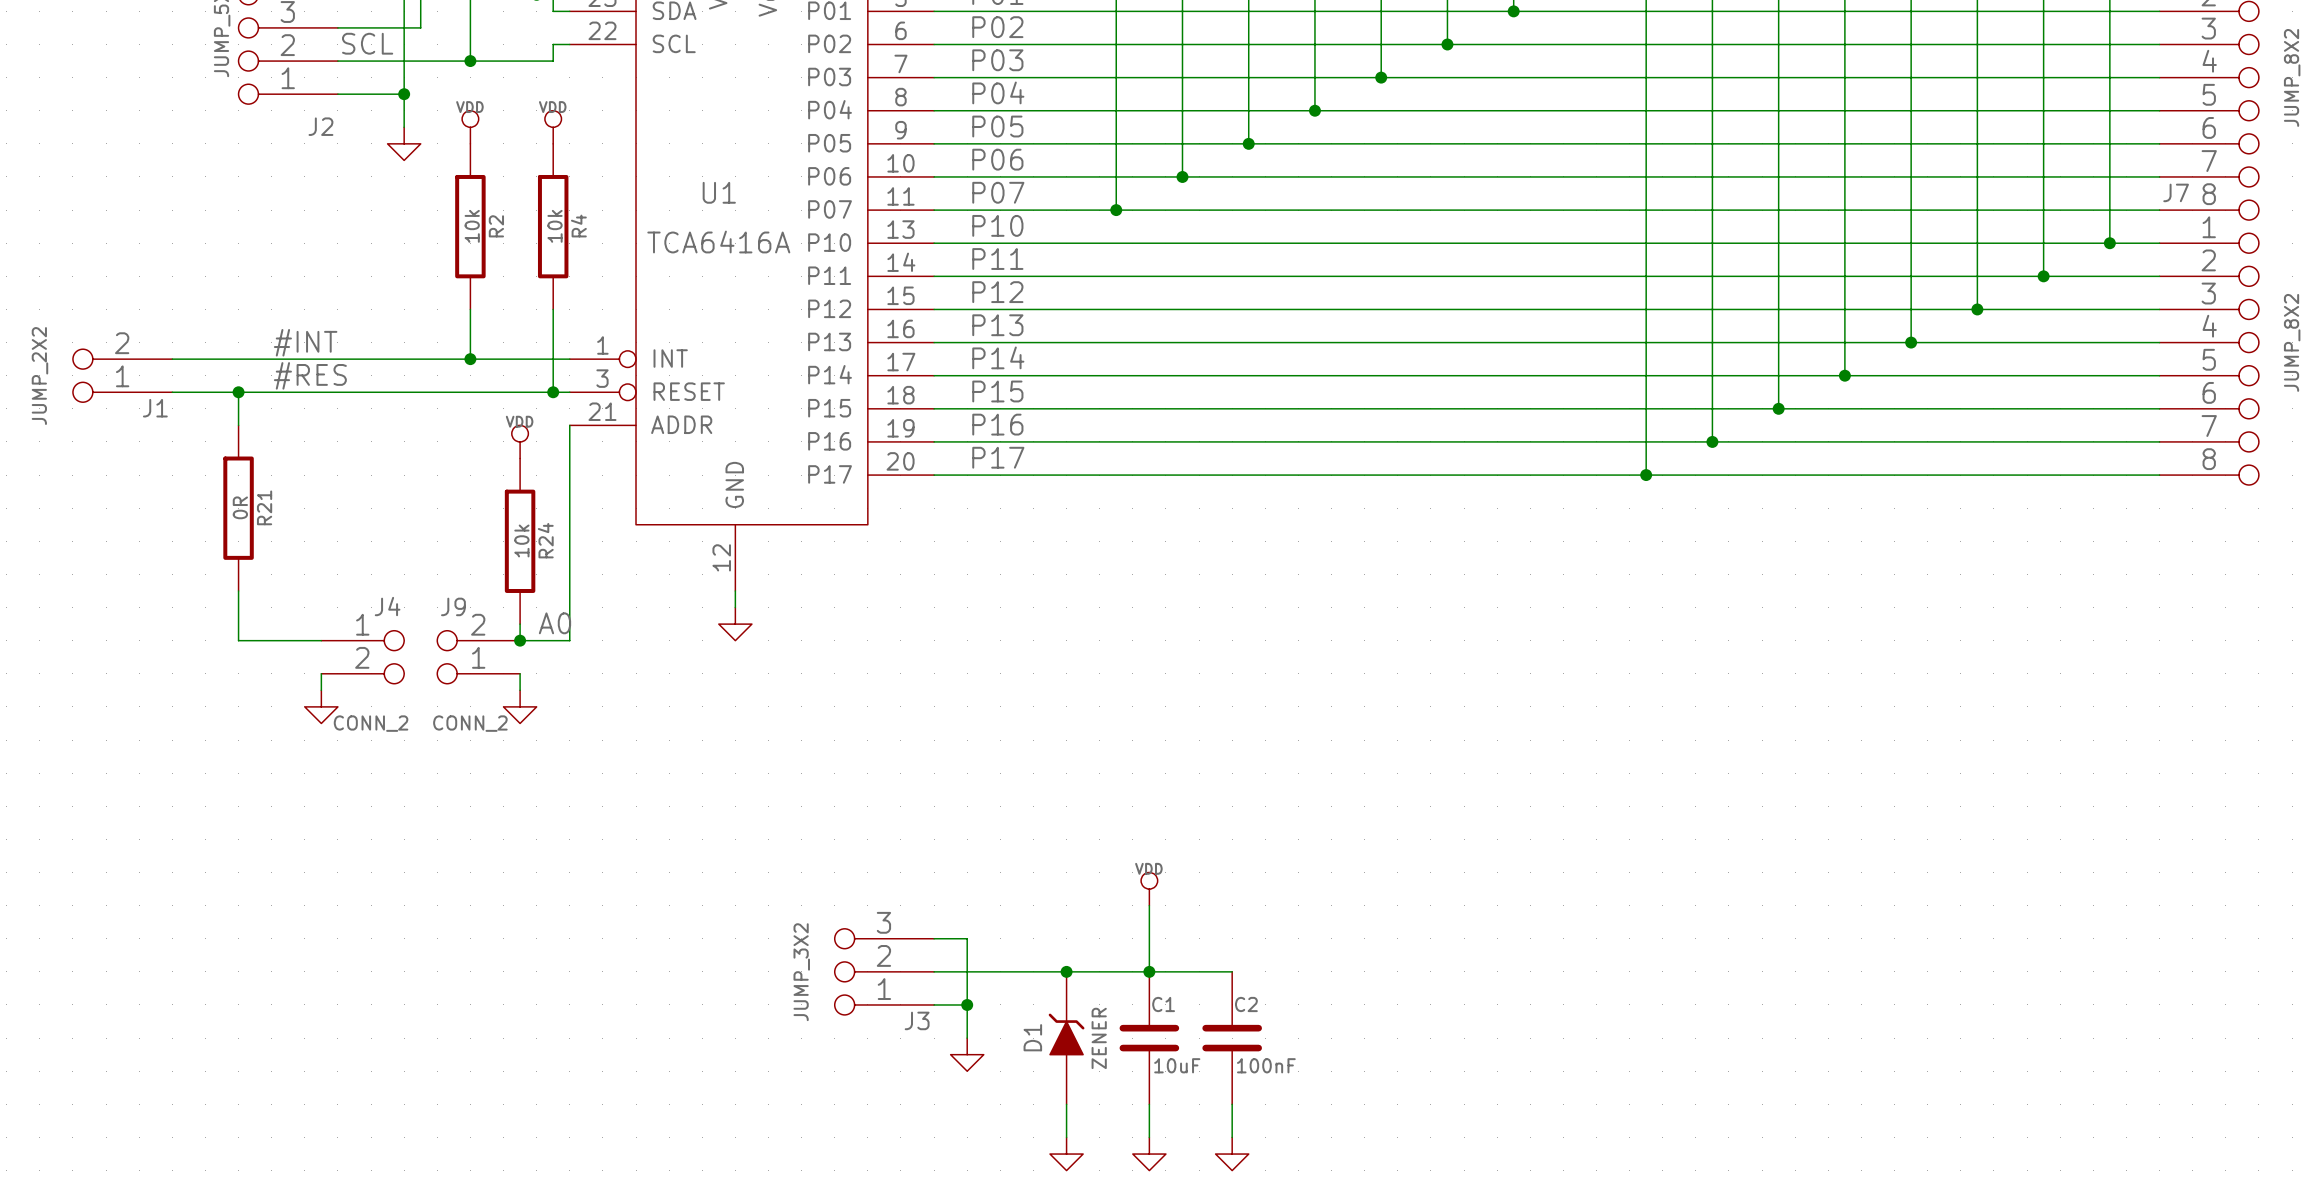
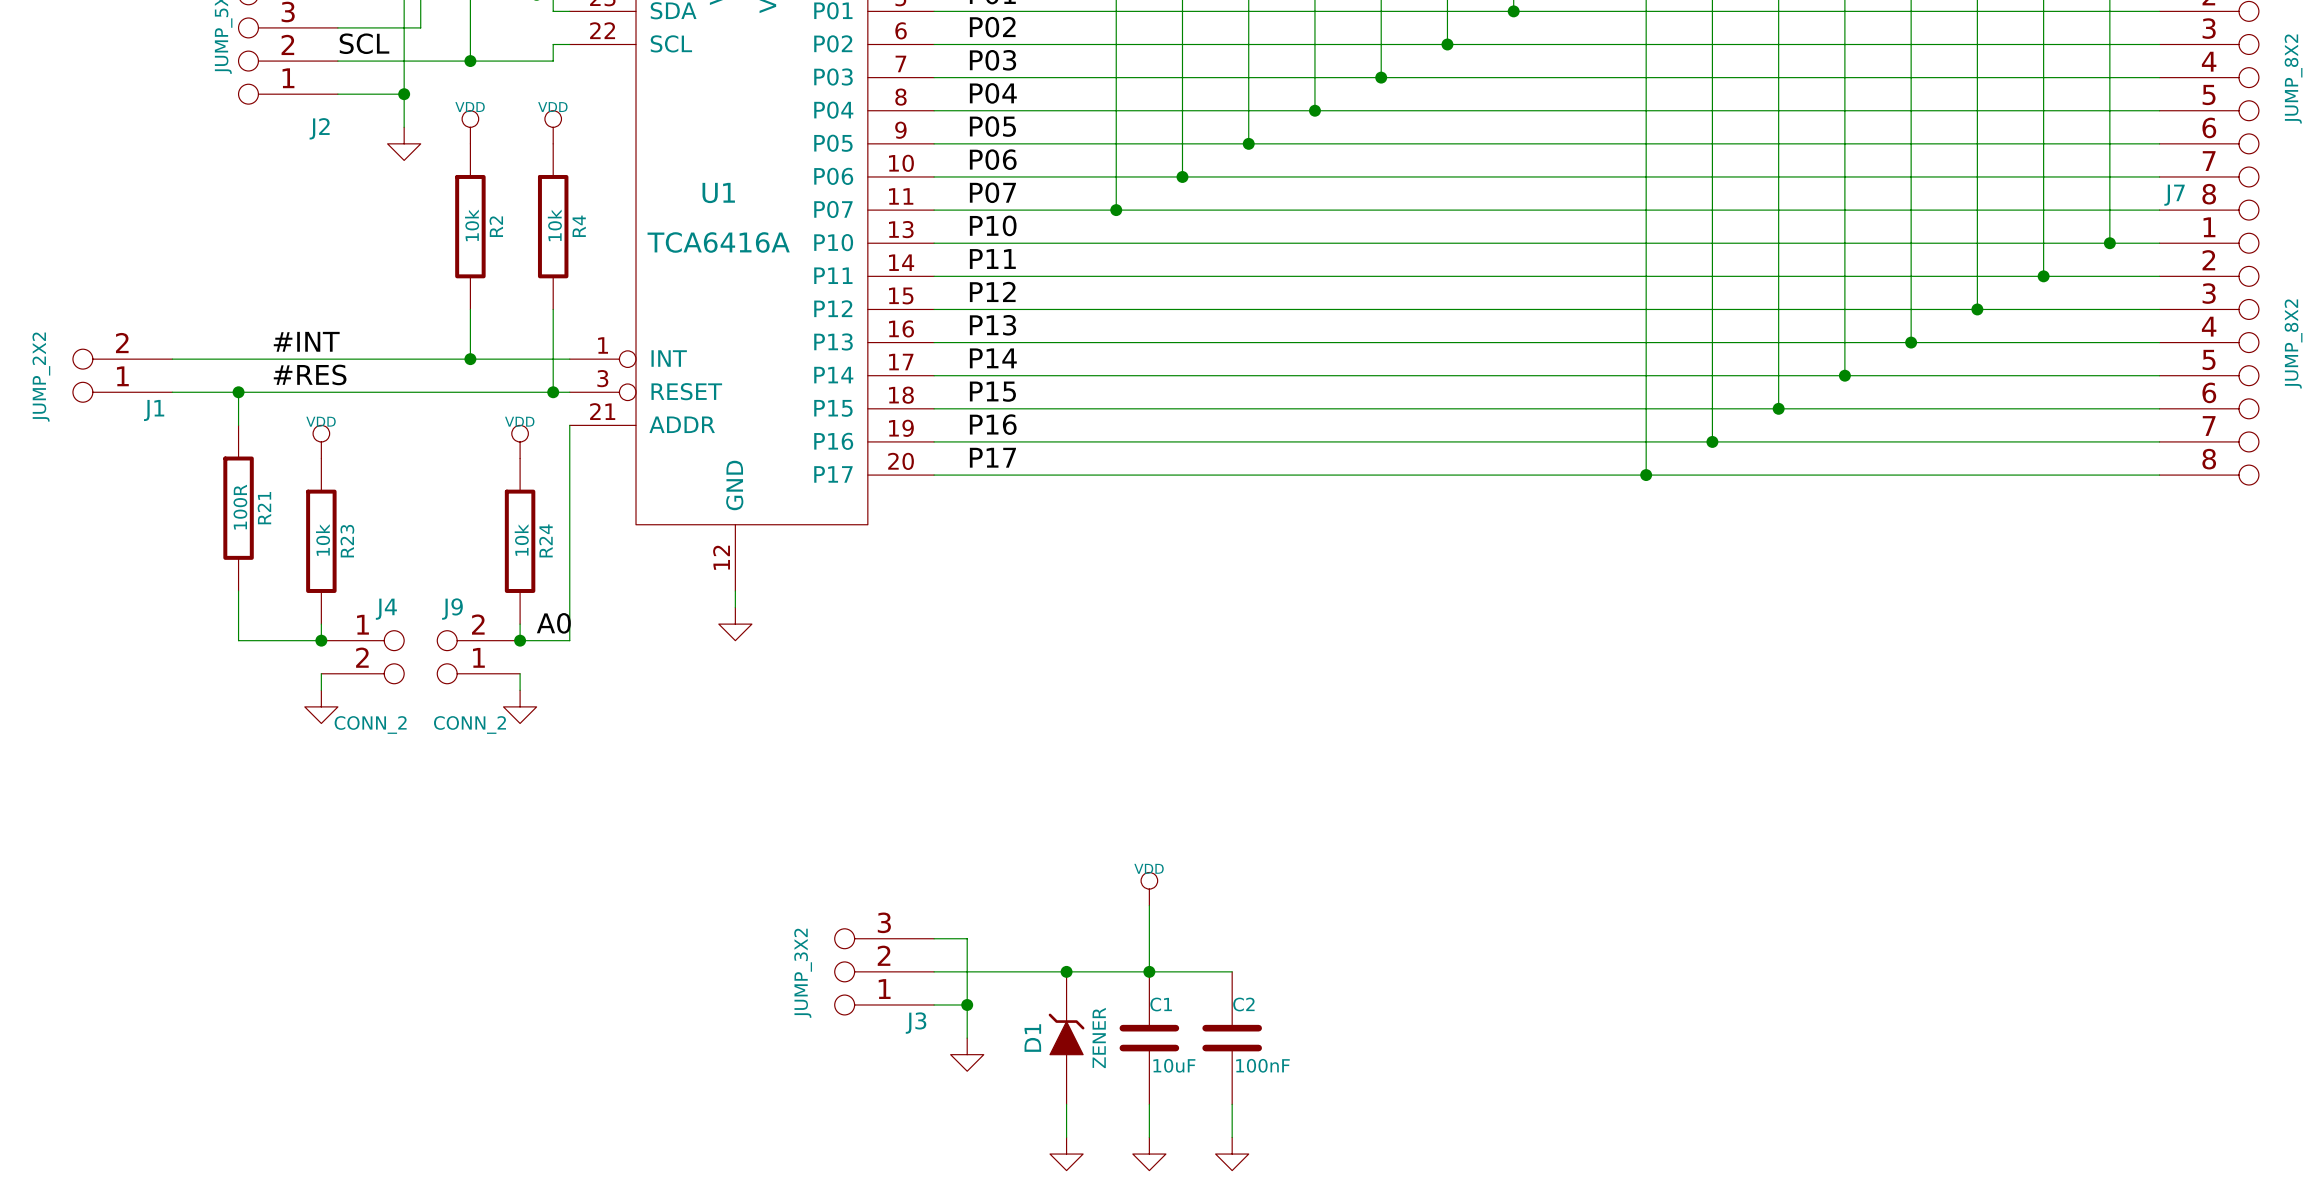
power symbol: none -> VDD (321, 441)
R21 value: 0R (240, 507) -> 100R (240, 507)
R23: none -> 10k (321, 541)
wire: none -> (321, 624) (321, 640)
junction: none -> (321, 640)

